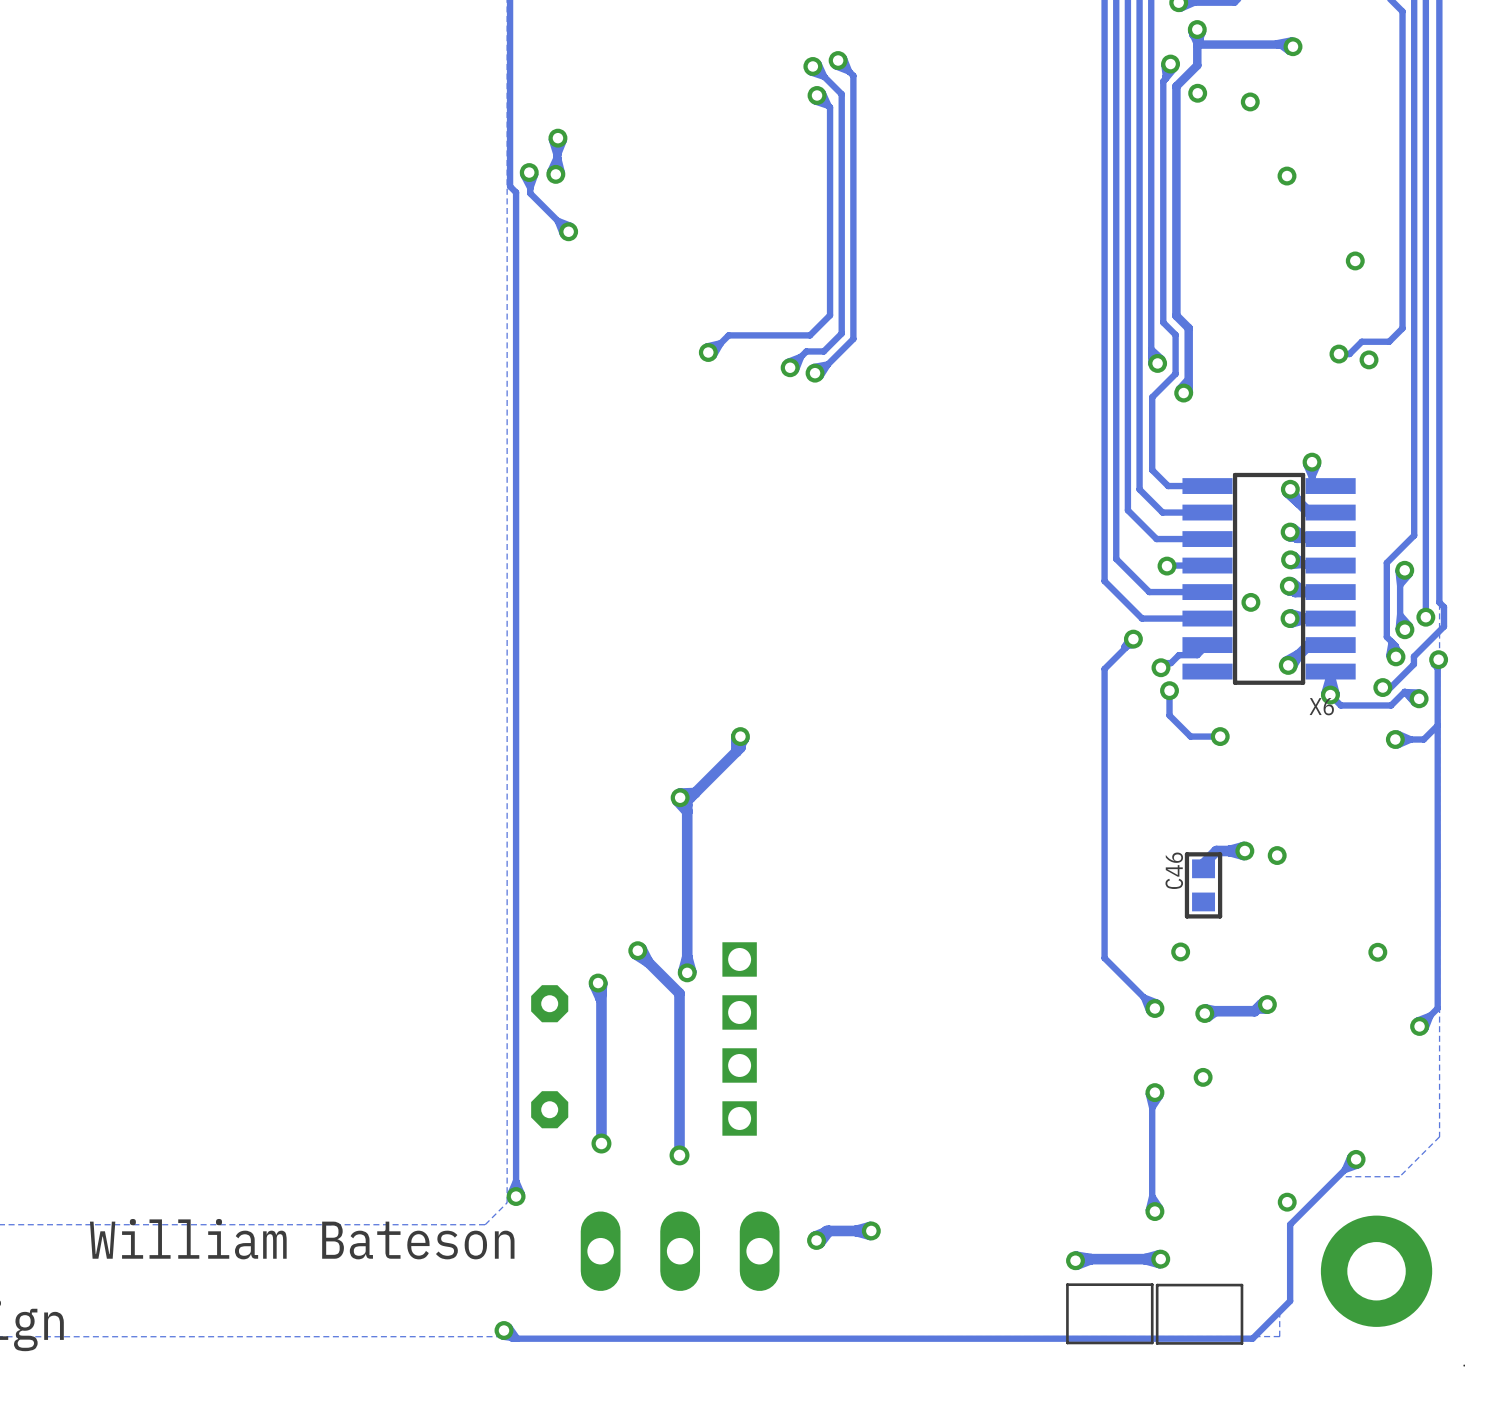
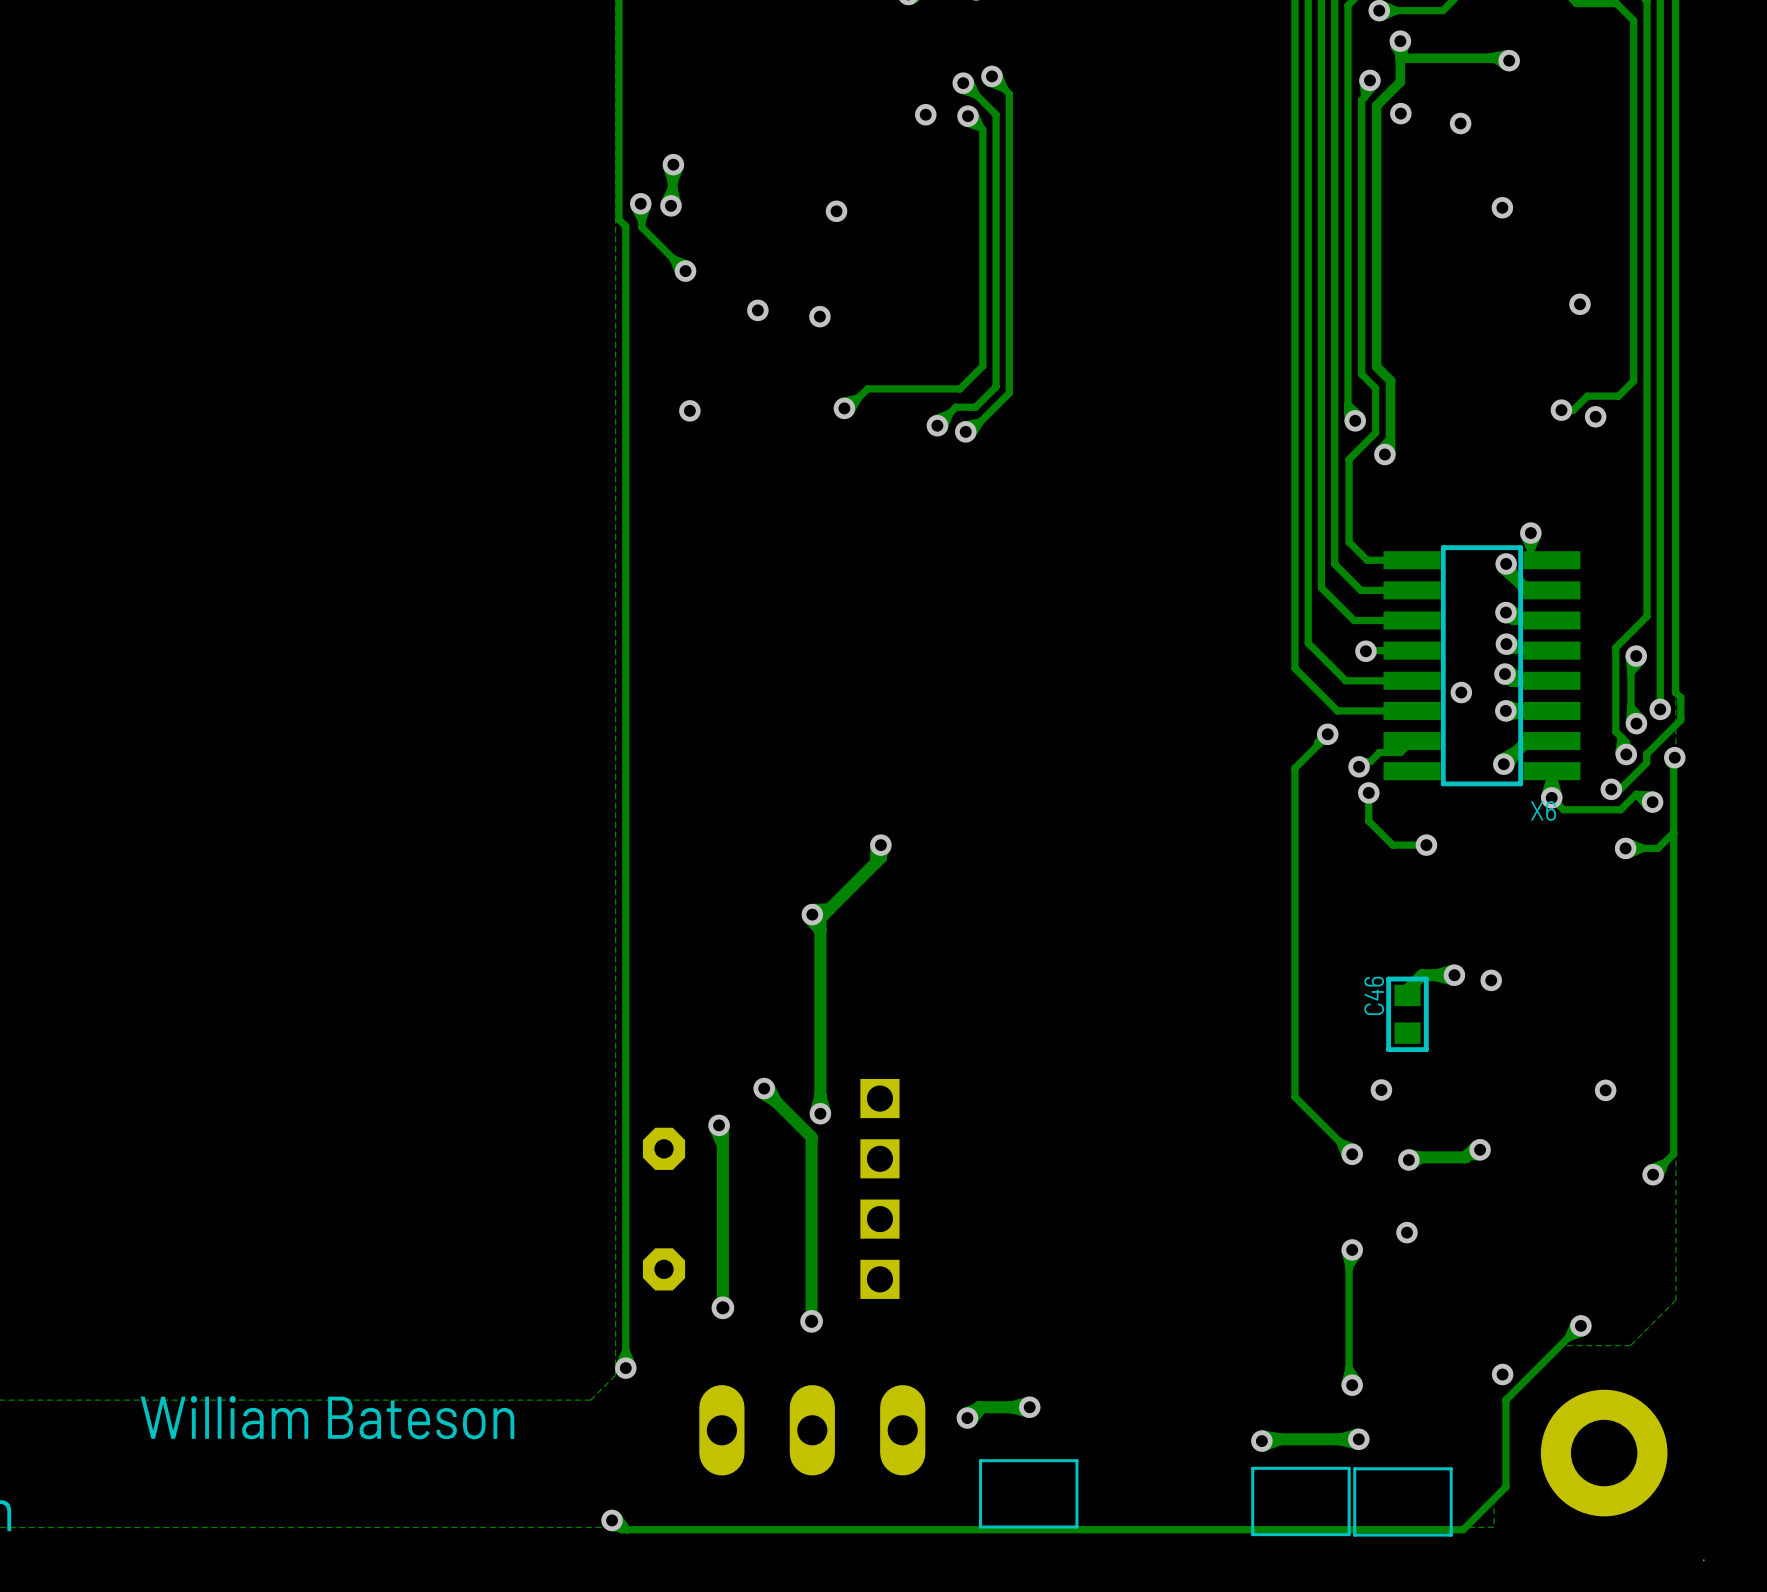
via: none -> (925, 114)
via: none -> (836, 211)
via: none -> (757, 310)
via: none -> (819, 316)
via: none -> (689, 410)
part: none -> (1028, 1493)

